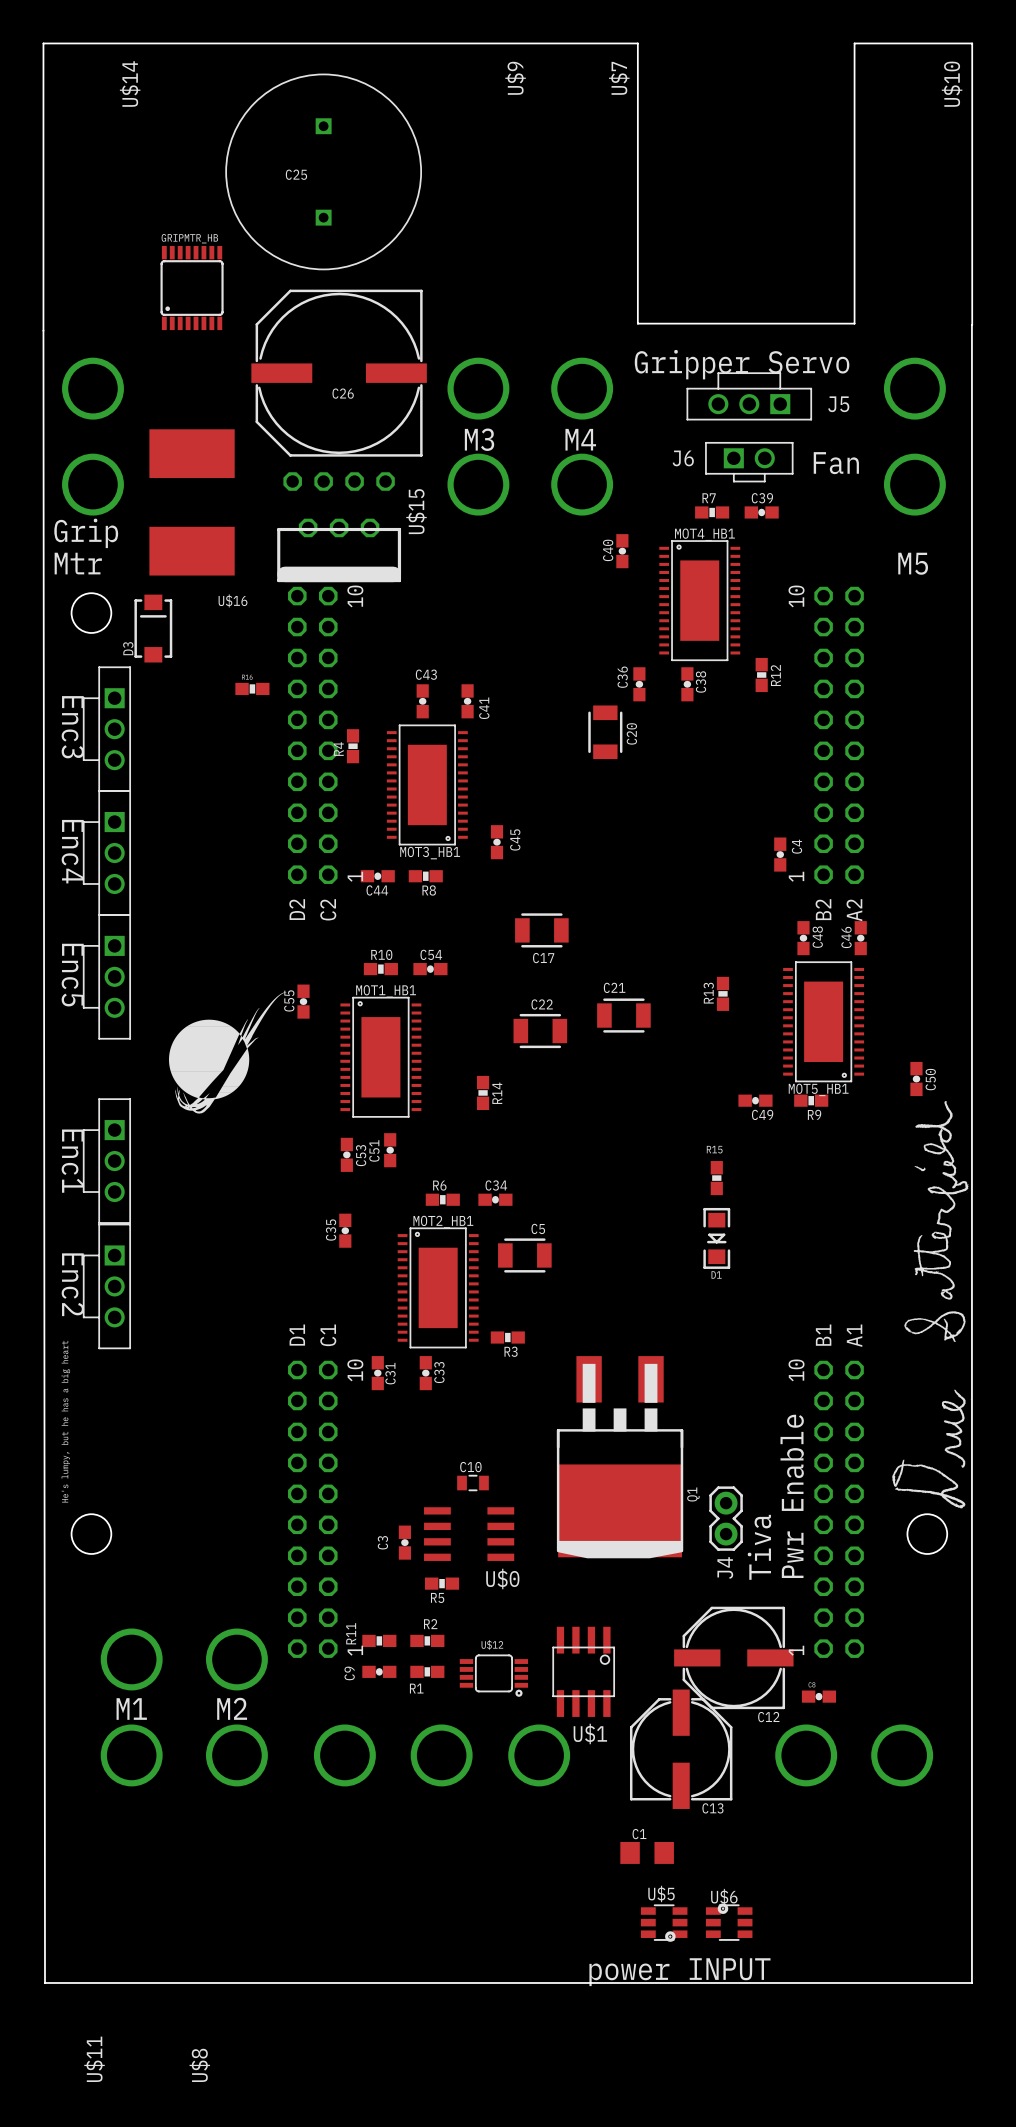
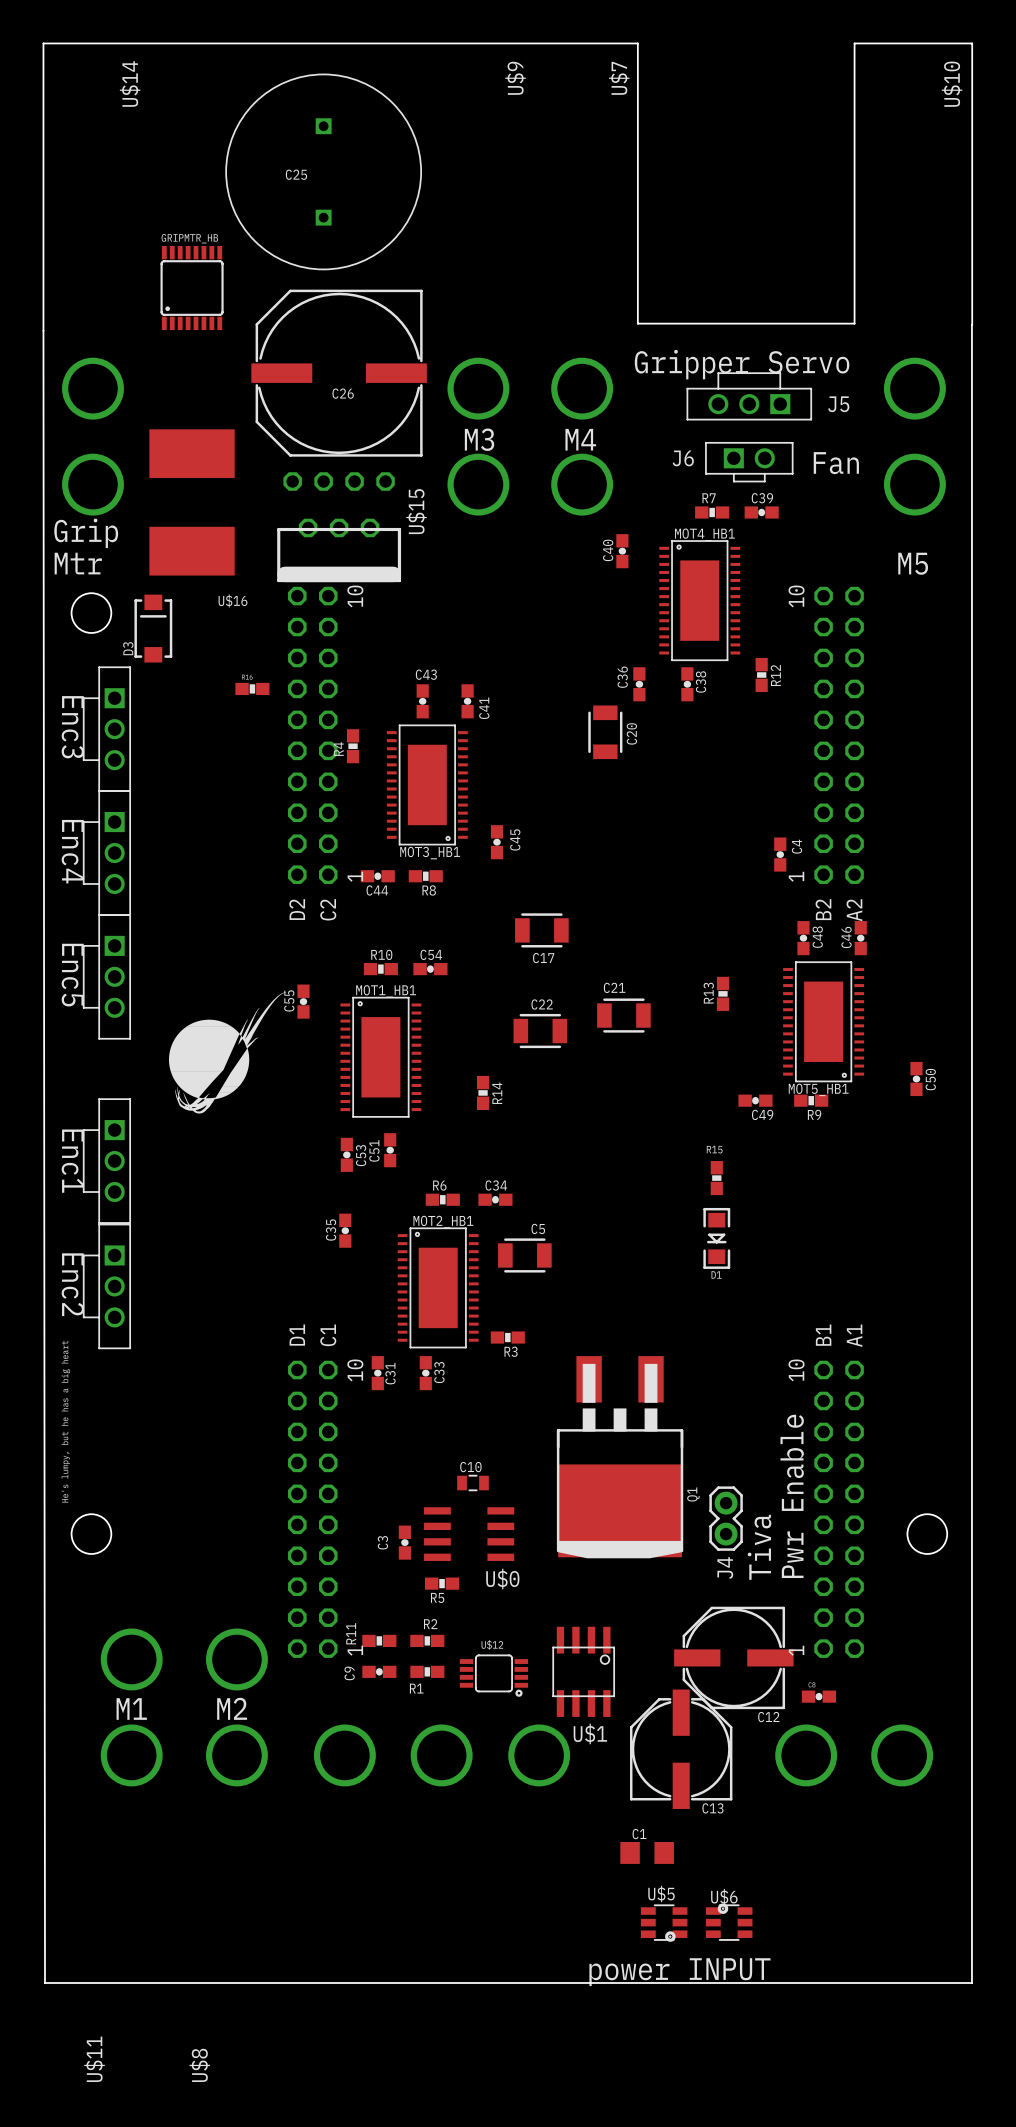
drawing: [904, 1101, 969, 1343] -> none
drawing: [914, 1166, 926, 1172] -> none
drawing: [941, 1389, 971, 1468] -> none
drawing: [892, 1459, 966, 1509] -> none

